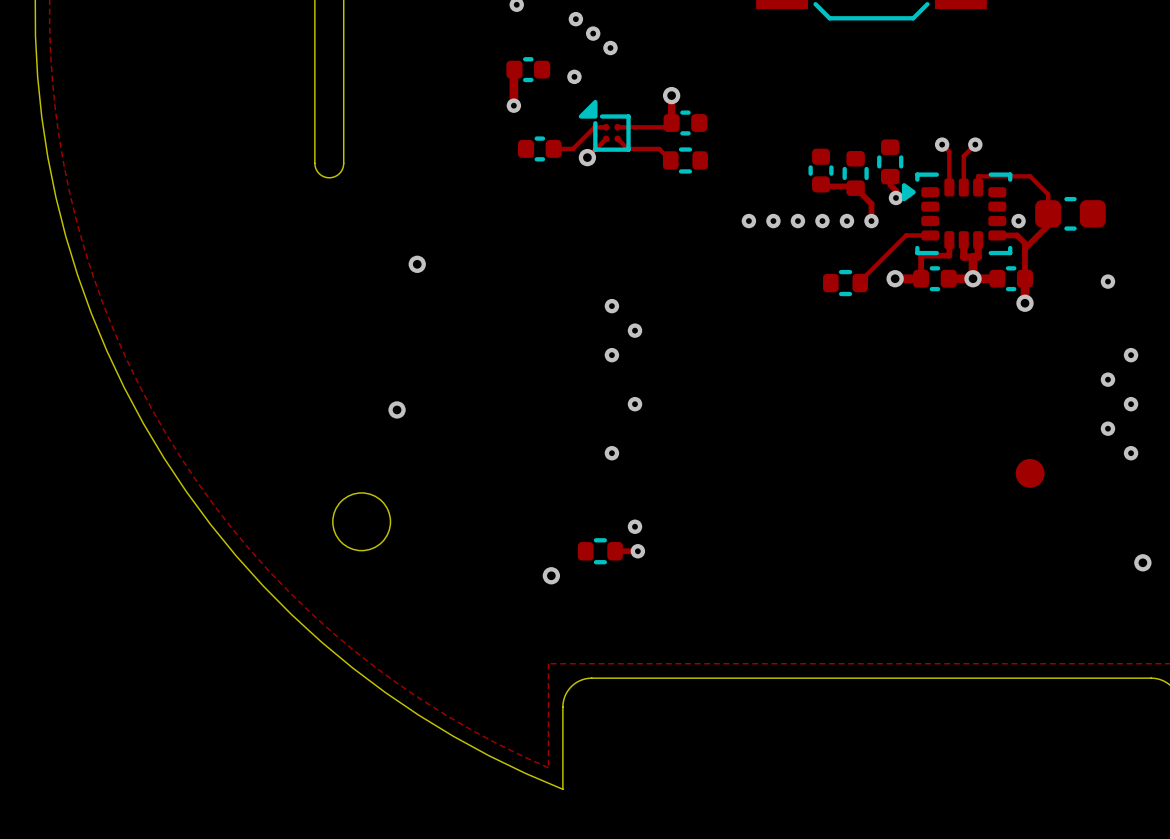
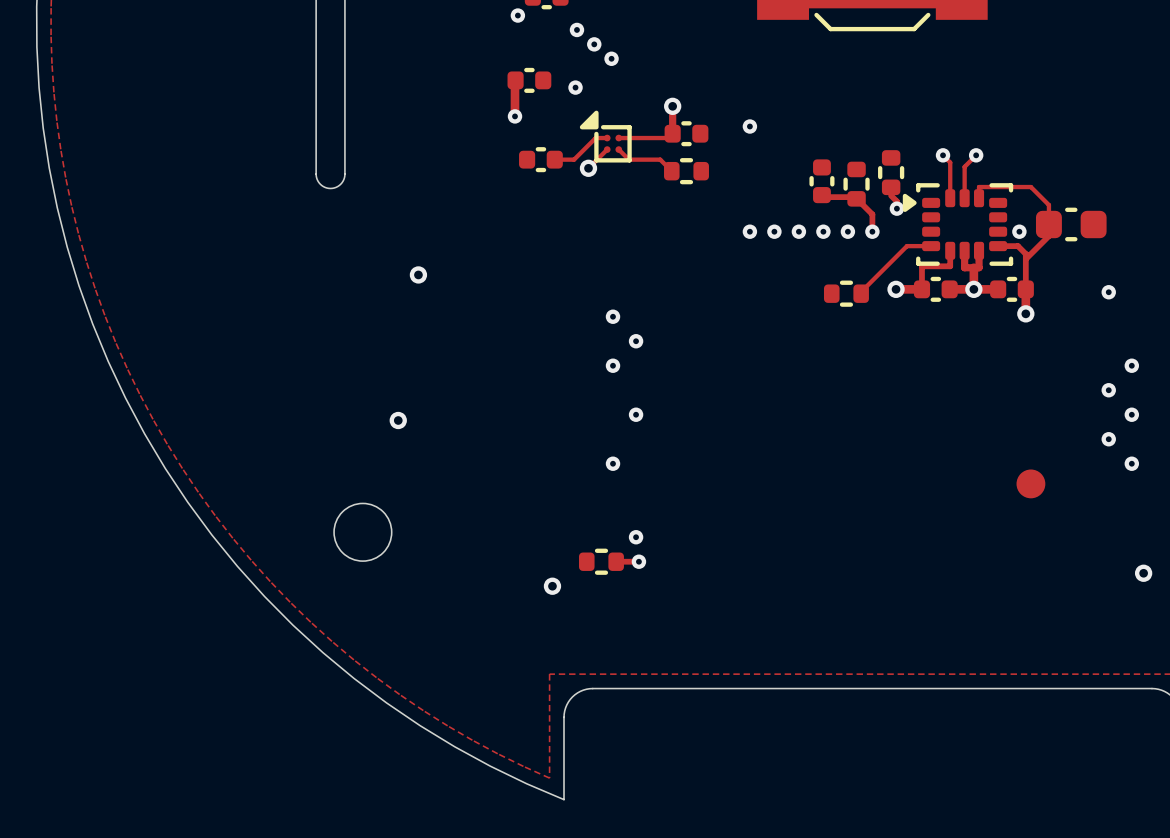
via: none -> (749, 126)

